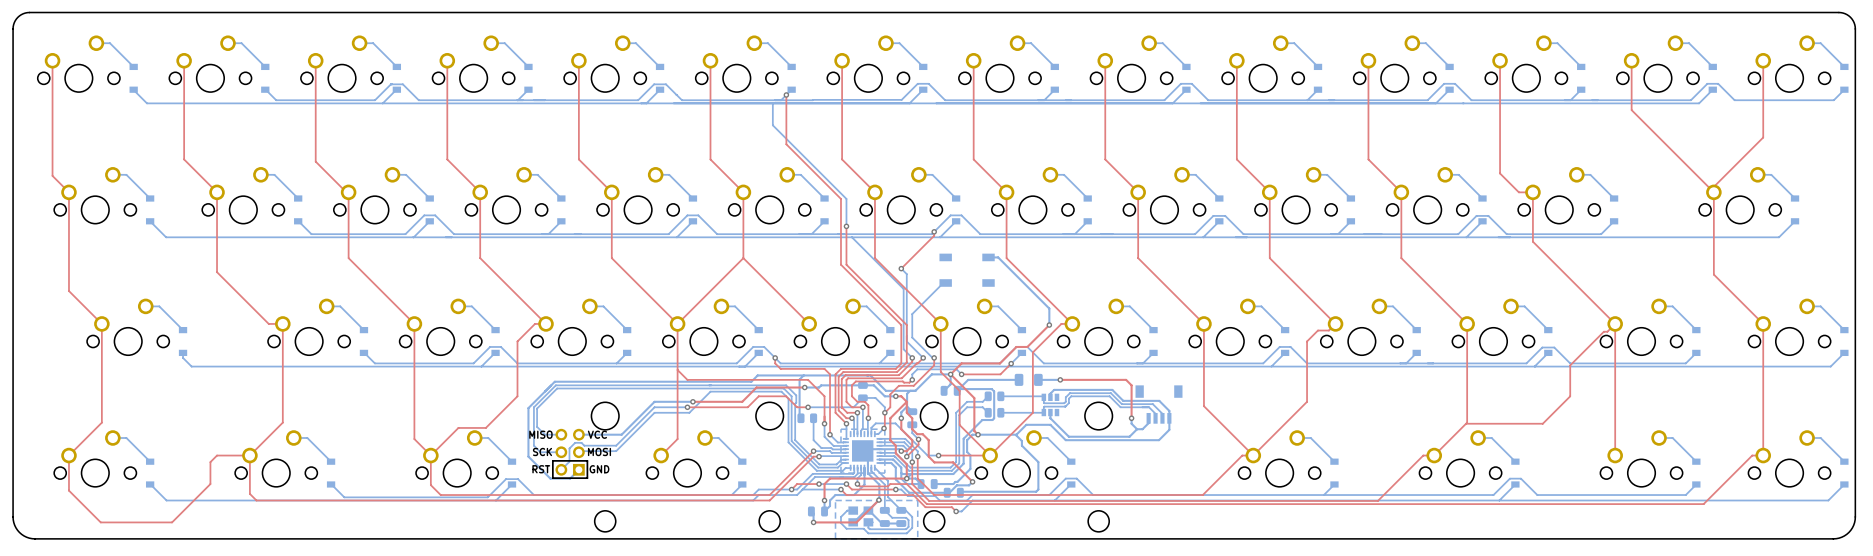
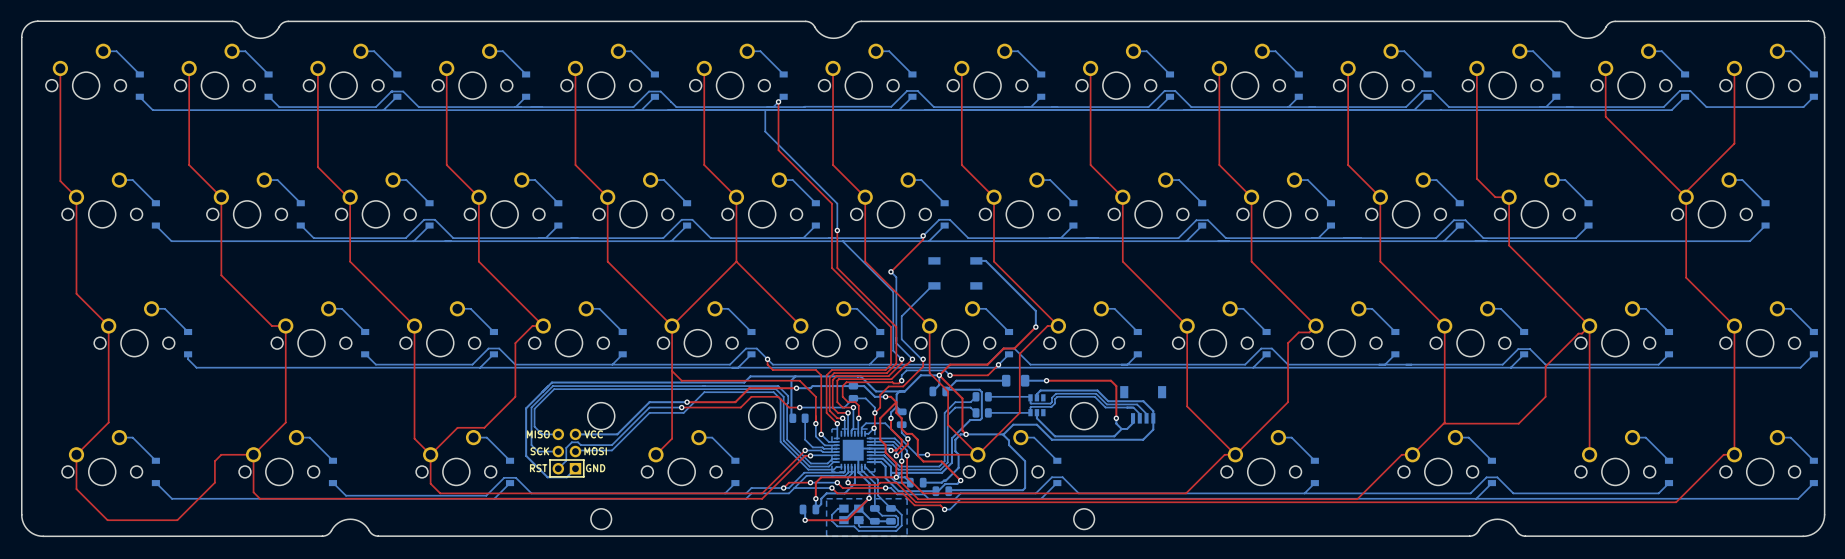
board edge: (29, 12) (1838, 12) -> (37, 21) (233, 21) (239, 24) (248, 34) (260, 38) (272, 34) (282, 23) (288, 21) (805, 21) (811, 23) (823, 35) (833, 38) (845, 34) (855, 23) (861, 21) (1559, 21) (1565, 23) (1577, 35) (1587, 38) (1599, 34) (1608, 24) (1614, 21) (1808, 21)
board edge: (34, 538) (1833, 538) -> (43, 536) (323, 536) (329, 533) (338, 523) (350, 519) (360, 521) (372, 534) (378, 536) (1469, 536) (1475, 534) (1485, 523) (1497, 519) (1509, 523) (1518, 533) (1524, 536) (1803, 536)

